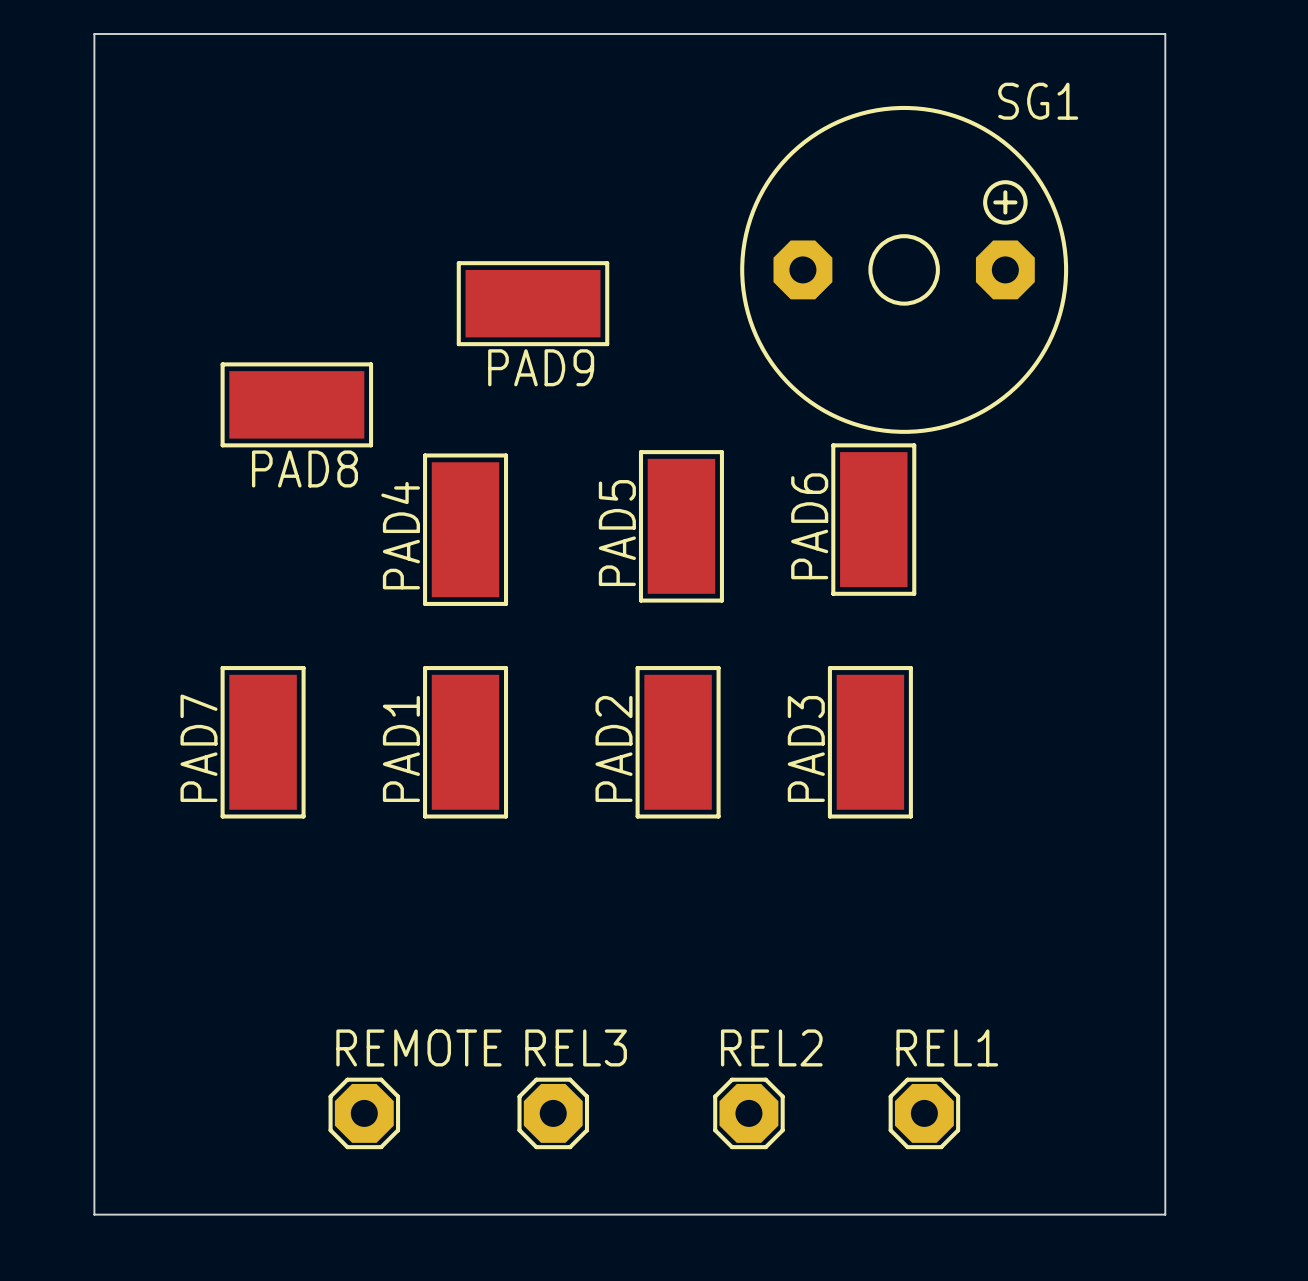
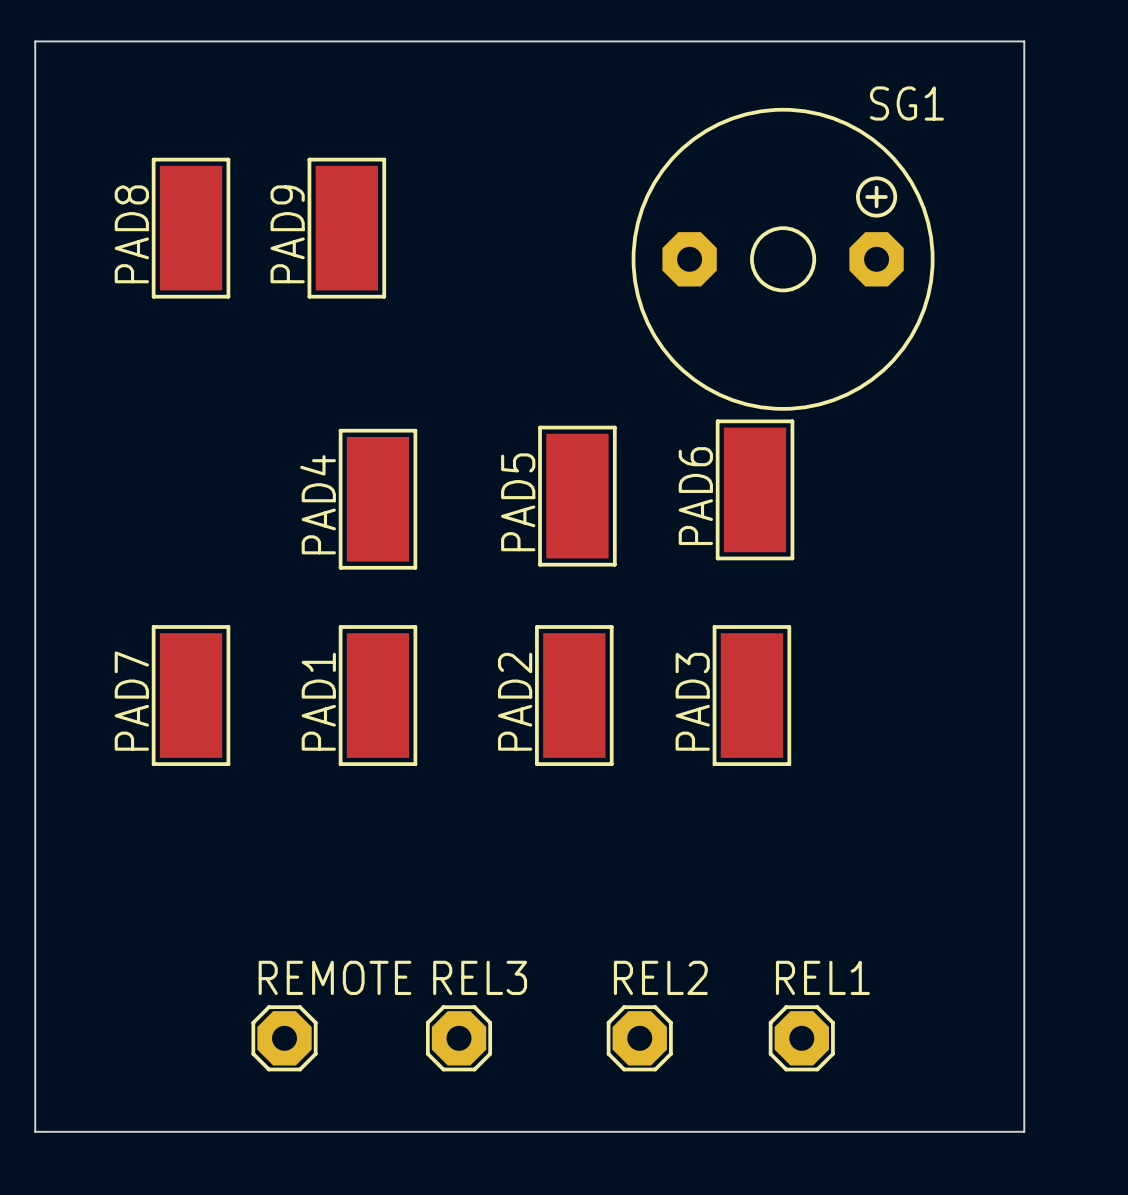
PAD9 rotation: 0° (533, 303) -> 90° clockwise (346, 228)
PAD9 position: (533, 303) -> (346, 228)
PAD8 rotation: 0° (296, 404) -> 90° clockwise (191, 228)
PAD8 position: (296, 404) -> (191, 228)

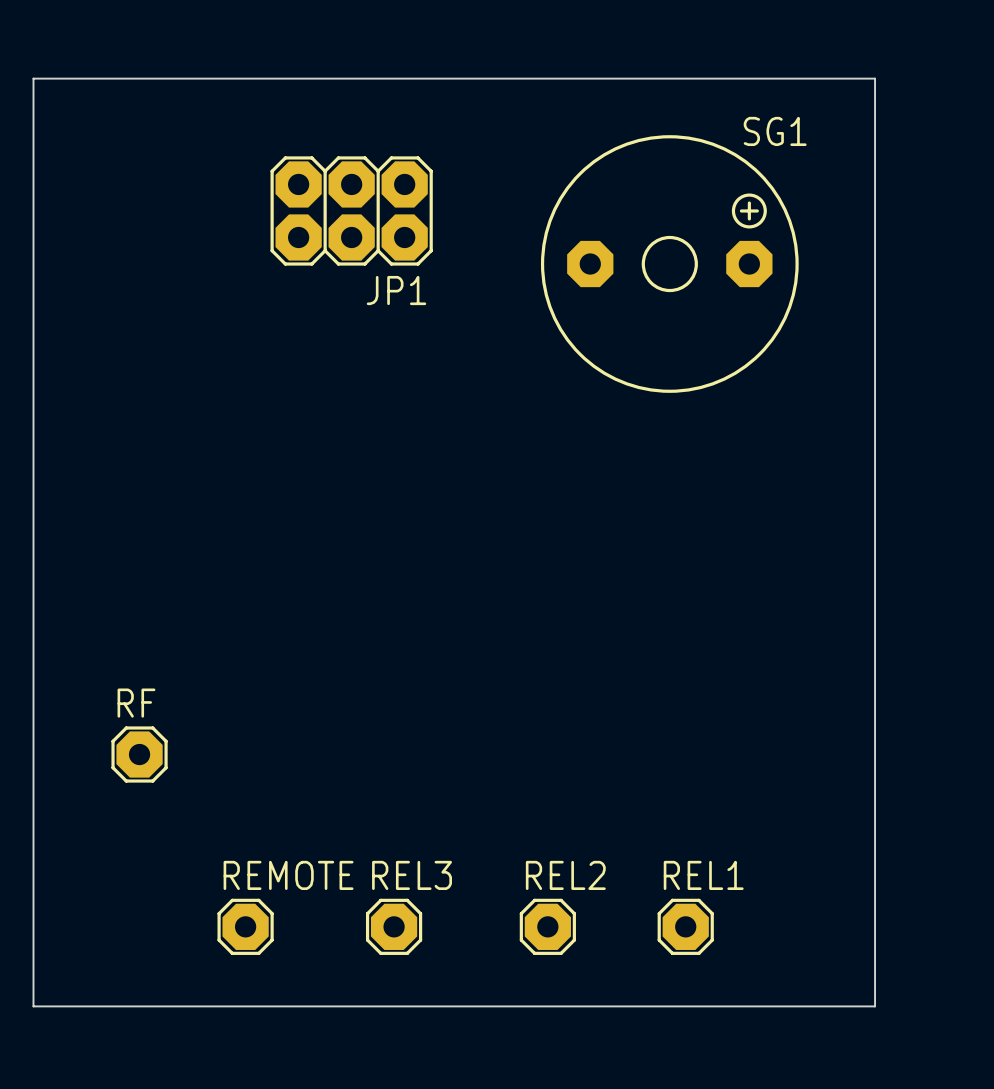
JP1: none -> (351, 210)
PAD8: (191, 228) -> none
PAD9: (346, 228) -> none
PAD6: (755, 489) -> none
PAD5: (577, 496) -> none
PAD4: (377, 499) -> none
PAD7: (191, 695) -> none
PAD1: (377, 695) -> none
PAD2: (574, 695) -> none
PAD3: (751, 695) -> none
RF: none -> (139, 754)

